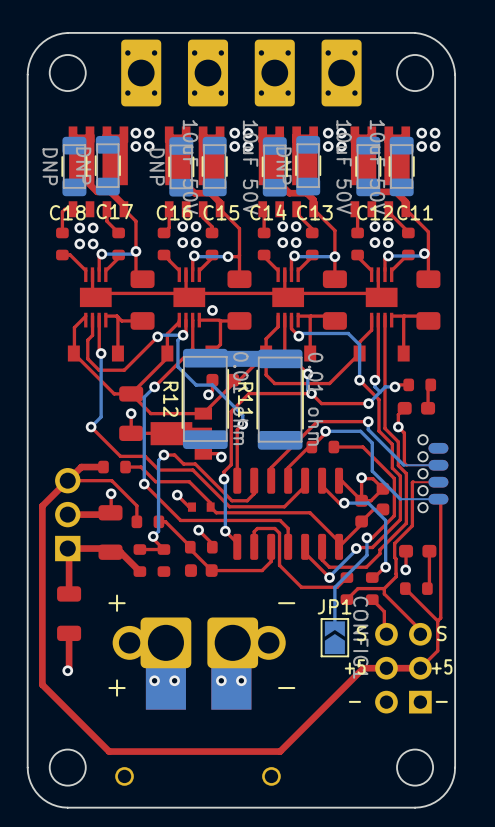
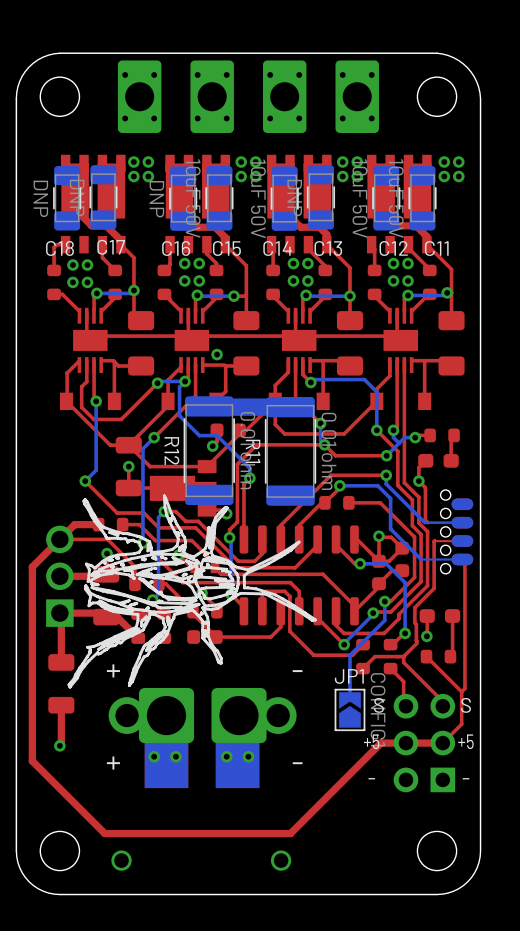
line: none -> (170, 518) (171, 520) (171, 519) (170, 518)
line: none -> (109, 532) (117, 535) (118, 533) (109, 532)
line: none -> (177, 532) (178, 535) (178, 532) (177, 532)
line: none -> (148, 544) (147, 550) (148, 544)
line: none -> (182, 545) (183, 547) (179, 550) (179, 547) (182, 545)
line: none -> (205, 552) (208, 553) (204, 555) (205, 552)
line: none -> (161, 556) (162, 557) (161, 557) (161, 556)
line: none -> (118, 557) (116, 557) (118, 557)
line: none -> (155, 557) (155, 559) (152, 557) (155, 557)
line: none -> (208, 557) (223, 560) (204, 560) (228, 563) (236, 573) (238, 583) (234, 594) (225, 602) (205, 605) (198, 594) (200, 590) (204, 598) (210, 598) (234, 592) (227, 592) (234, 588) (231, 587) (199, 589) (195, 580) (196, 577) (225, 579) (215, 580) (217, 581) (232, 580) (230, 572) (222, 570) (226, 569) (201, 567) (203, 559) (208, 557)
line: none -> (143, 558) (142, 559) (145, 559) (143, 558)
line: none -> (164, 558) (165, 558) (166, 558) (164, 558)
line: none -> (110, 559) (108, 559) (112, 559) (110, 559)
line: none -> (104, 562) (104, 562) (104, 563) (105, 562) (104, 562)
line: none -> (121, 564) (123, 564) (121, 564) (121, 564)
line: none -> (207, 564) (208, 565) (207, 565) (207, 564)
line: none -> (196, 564) (189, 569) (166, 576) (183, 579) (191, 576) (188, 580) (193, 581) (196, 564)
line: none -> (113, 566) (111, 566) (112, 567) (113, 566)
line: none -> (155, 568) (154, 568) (155, 568) (155, 568)
line: none -> (202, 568) (199, 569) (198, 575) (201, 575) (200, 571) (203, 570) (202, 568)
line: none -> (98, 571) (94, 572) (92, 575) (98, 573) (98, 571)
line: none -> (186, 574) (183, 575) (184, 574) (186, 574)
line: none -> (133, 577) (133, 578) (134, 578) (133, 577)
line: none -> (152, 581) (150, 581) (151, 582) (152, 581)
line: none -> (91, 582) (98, 584) (92, 584) (91, 582)
line: none -> (229, 584) (223, 585) (233, 584) (229, 584)
line: none -> (222, 584) (220, 585) (220, 584) (222, 584)
line: none -> (99, 601) (115, 610) (132, 610) (111, 606) (99, 601)
line: none -> (159, 600) (158, 601) (162, 601) (159, 600)
line: none -> (136, 603) (134, 604) (133, 604) (134, 603) (136, 603)
line: none -> (132, 604) (130, 605) (130, 605) (132, 604)
line: none -> (197, 604) (185, 610) (177, 611) (182, 608) (197, 604)
line: none -> (147, 607) (148, 608) (146, 608) (147, 607)
line: none -> (201, 612) (200, 614) (201, 612)
line: none -> (146, 616) (145, 623) (141, 626) (142, 620) (146, 616)
line: none -> (167, 617) (168, 624) (170, 621) (167, 617)
line: none -> (205, 622) (205, 622)
line: none -> (138, 629) (103, 645) (98, 649) (130, 634) (138, 629)
line: none -> (205, 630) (205, 636) (204, 632) (205, 630)
line: none -> (166, 631) (164, 632) (165, 633) (166, 631)
line: none -> (162, 635) (146, 650) (153, 641) (162, 635)
line: none -> (70, 687) (68, 684) (90, 652) (87, 647) (98, 644) (136, 627) (138, 620) (137, 614) (113, 611) (97, 602) (92, 602) (88, 605) (90, 596) (85, 588) (85, 585) (90, 593) (97, 596) (119, 603) (129, 600) (120, 604) (135, 609) (154, 611) (175, 610) (181, 607) (160, 607) (129, 596) (91, 587) (113, 591) (149, 602) (188, 603) (195, 600) (168, 599) (149, 586) (139, 578) (143, 579) (147, 583) (158, 592) (159, 592) (161, 592) (160, 592) (163, 596) (182, 598) (197, 597) (191, 587) (186, 582) (137, 574) (151, 568) (142, 574) (167, 574) (191, 566) (186, 560) (198, 562) (180, 554) (154, 554) (123, 560) (99, 569) (107, 571) (140, 564) (178, 562) (172, 557) (183, 562) (158, 564) (124, 570) (132, 571) (132, 574) (131, 576) (112, 572) (100, 575) (88, 581) (89, 569) (86, 564) (94, 568) (109, 557) (139, 552) (141, 548) (139, 542) (133, 540) (127, 542) (125, 538) (106, 538) (84, 503) (85, 499) (100, 524) (114, 531) (139, 536) (149, 541) (151, 552) (172, 549) (177, 545) (178, 539) (166, 515) (164, 495) (172, 516) (184, 537) (185, 547) (183, 551) (186, 554) (193, 556) (205, 548) (208, 527) (209, 548) (211, 528) (215, 517) (225, 507) (227, 507) (215, 523) (211, 552) (212, 555) (226, 560) (235, 566) (247, 570) (281, 553) (299, 542) (281, 556) (247, 572) (244, 575) (244, 587) (256, 588) (275, 594) (315, 619) (312, 620) (265, 593) (240, 593) (217, 608) (211, 609) (202, 607) (207, 617) (208, 636) (221, 658) (221, 663) (218, 662) (213, 650) (202, 637) (202, 621) (194, 611) (192, 610) (174, 614) (166, 634) (144, 656) (129, 685) (143, 647) (163, 631) (165, 627) (163, 618) (149, 614) (143, 630) (121, 642) (109, 646) (100, 653) (97, 652) (83, 667) (70, 687)

